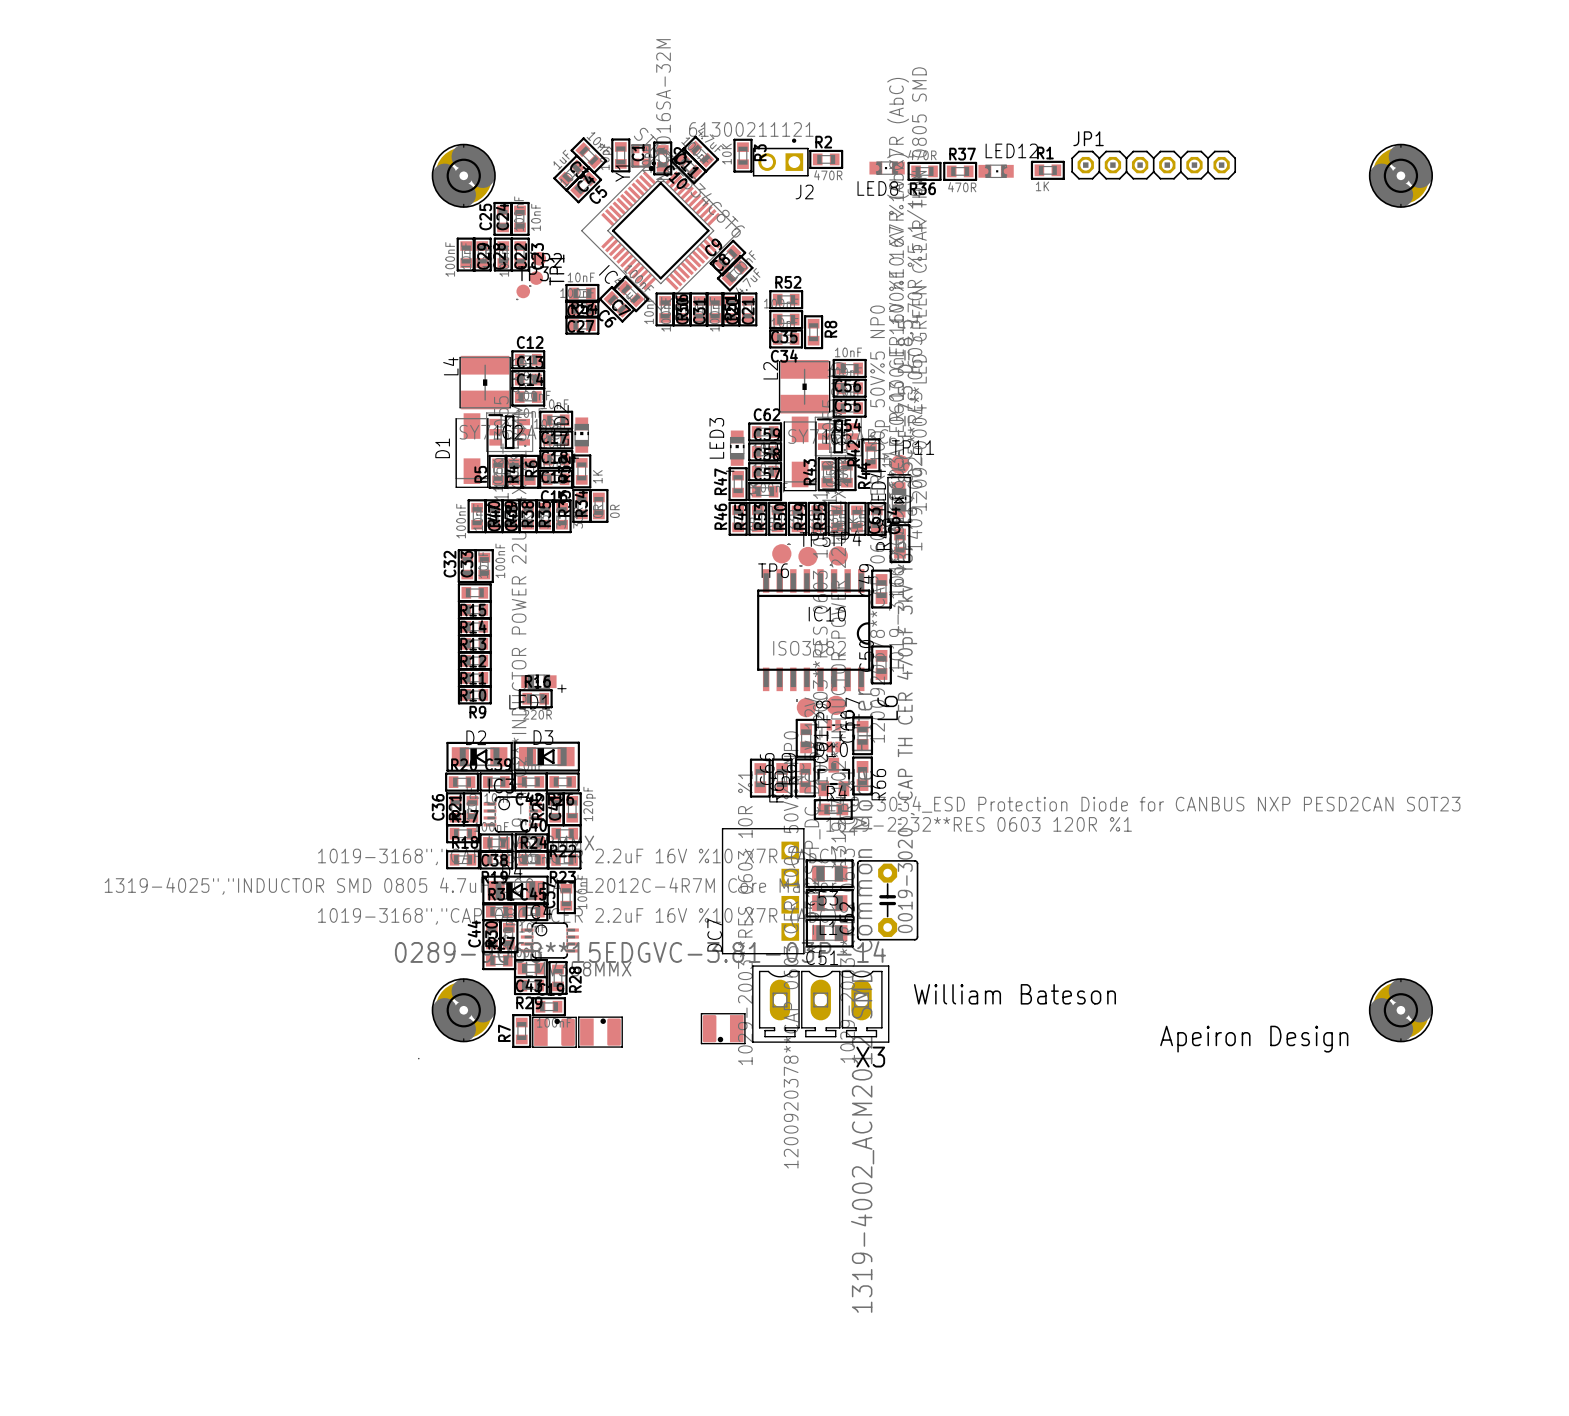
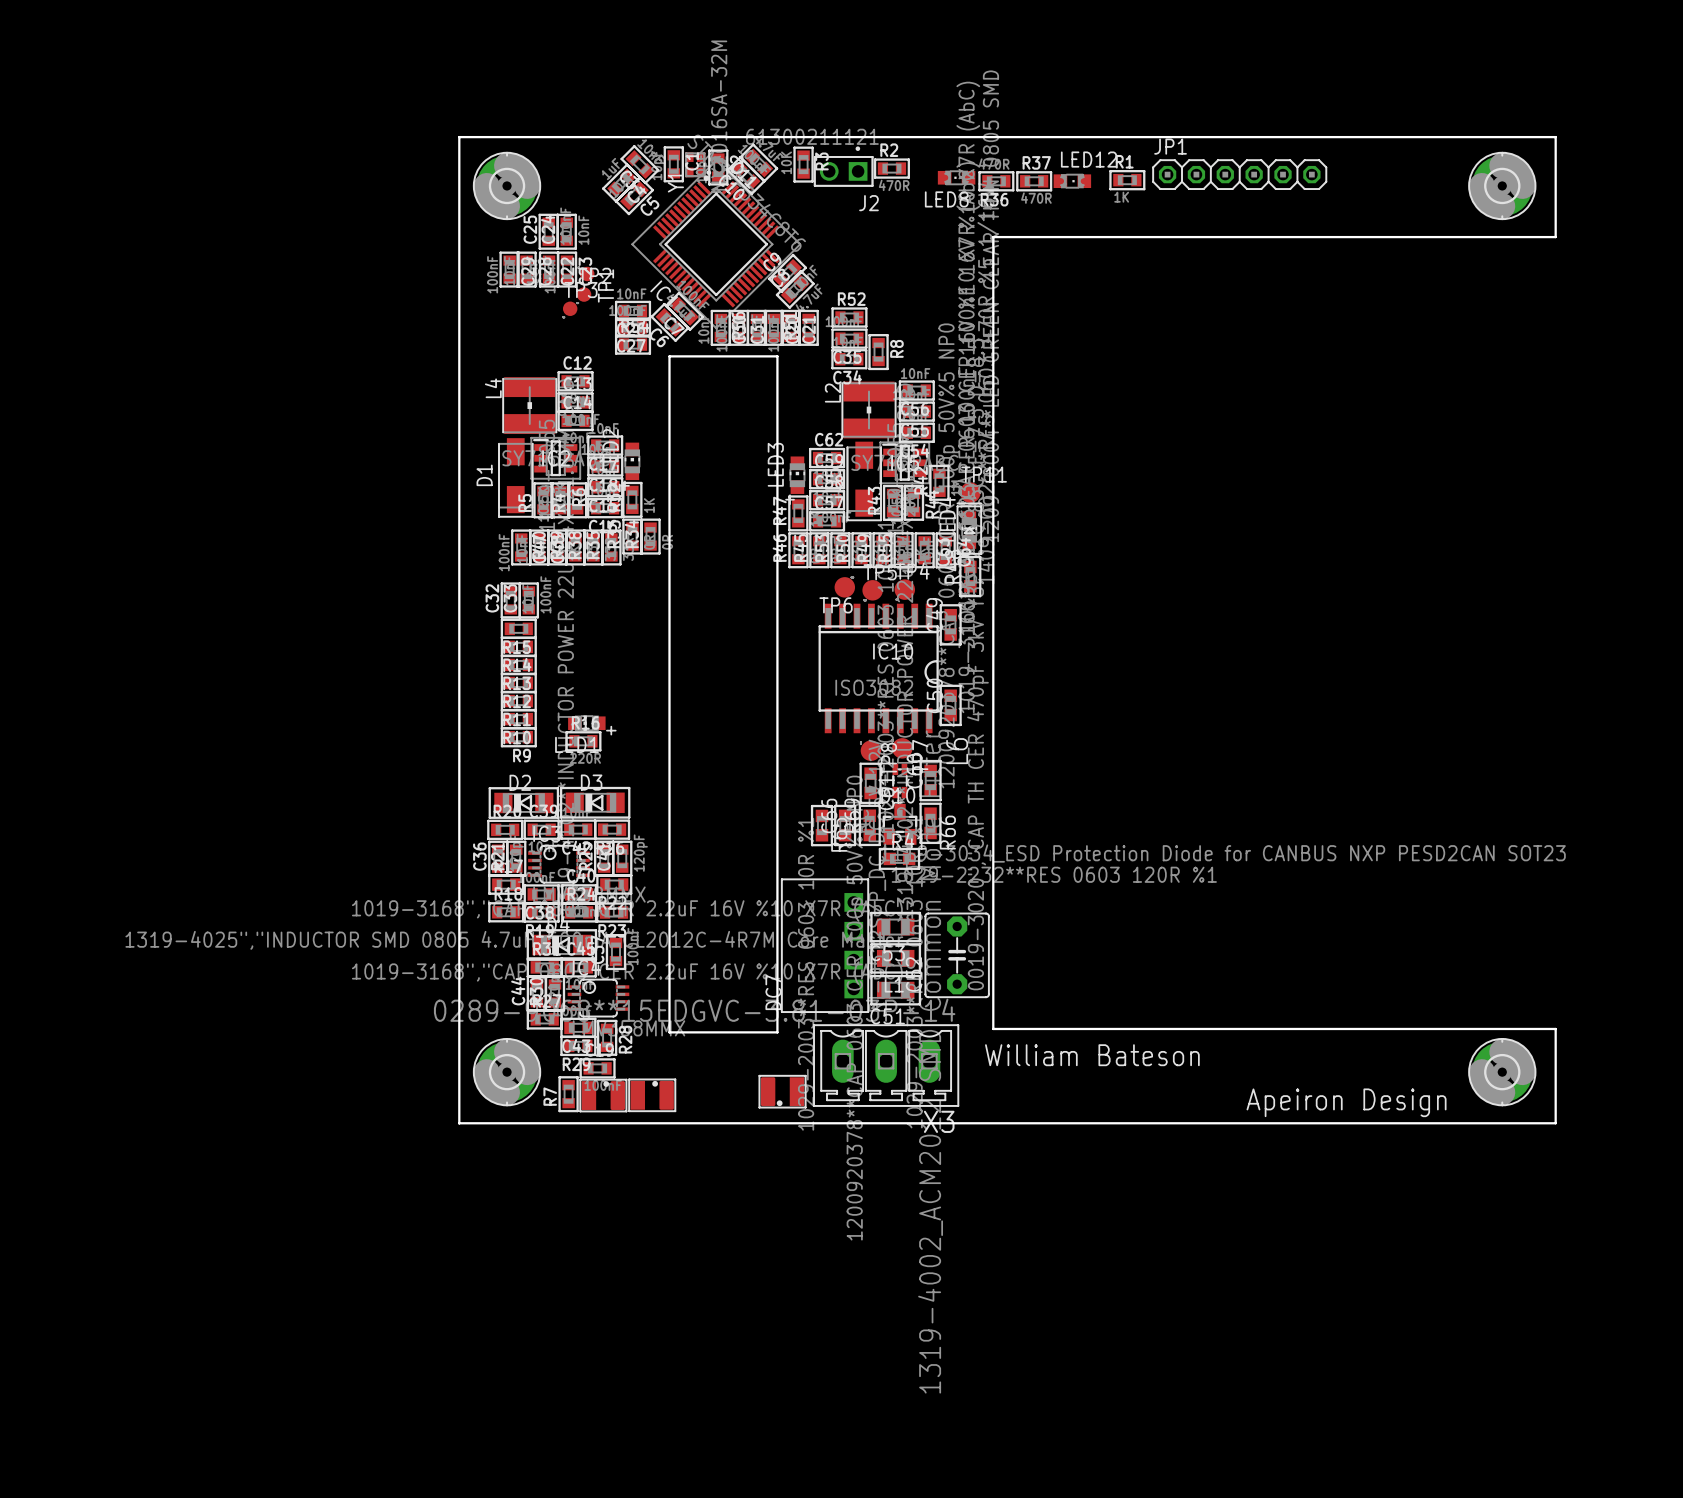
board edge: none -> (459, 137) (459, 1123) (1555, 1123) (1555, 1028) (993, 1028) (993, 237) (1555, 237) (1555, 137) (459, 137)
board edge: none -> (669, 356) (669, 1032) (777, 1032) (777, 356) (669, 356)

